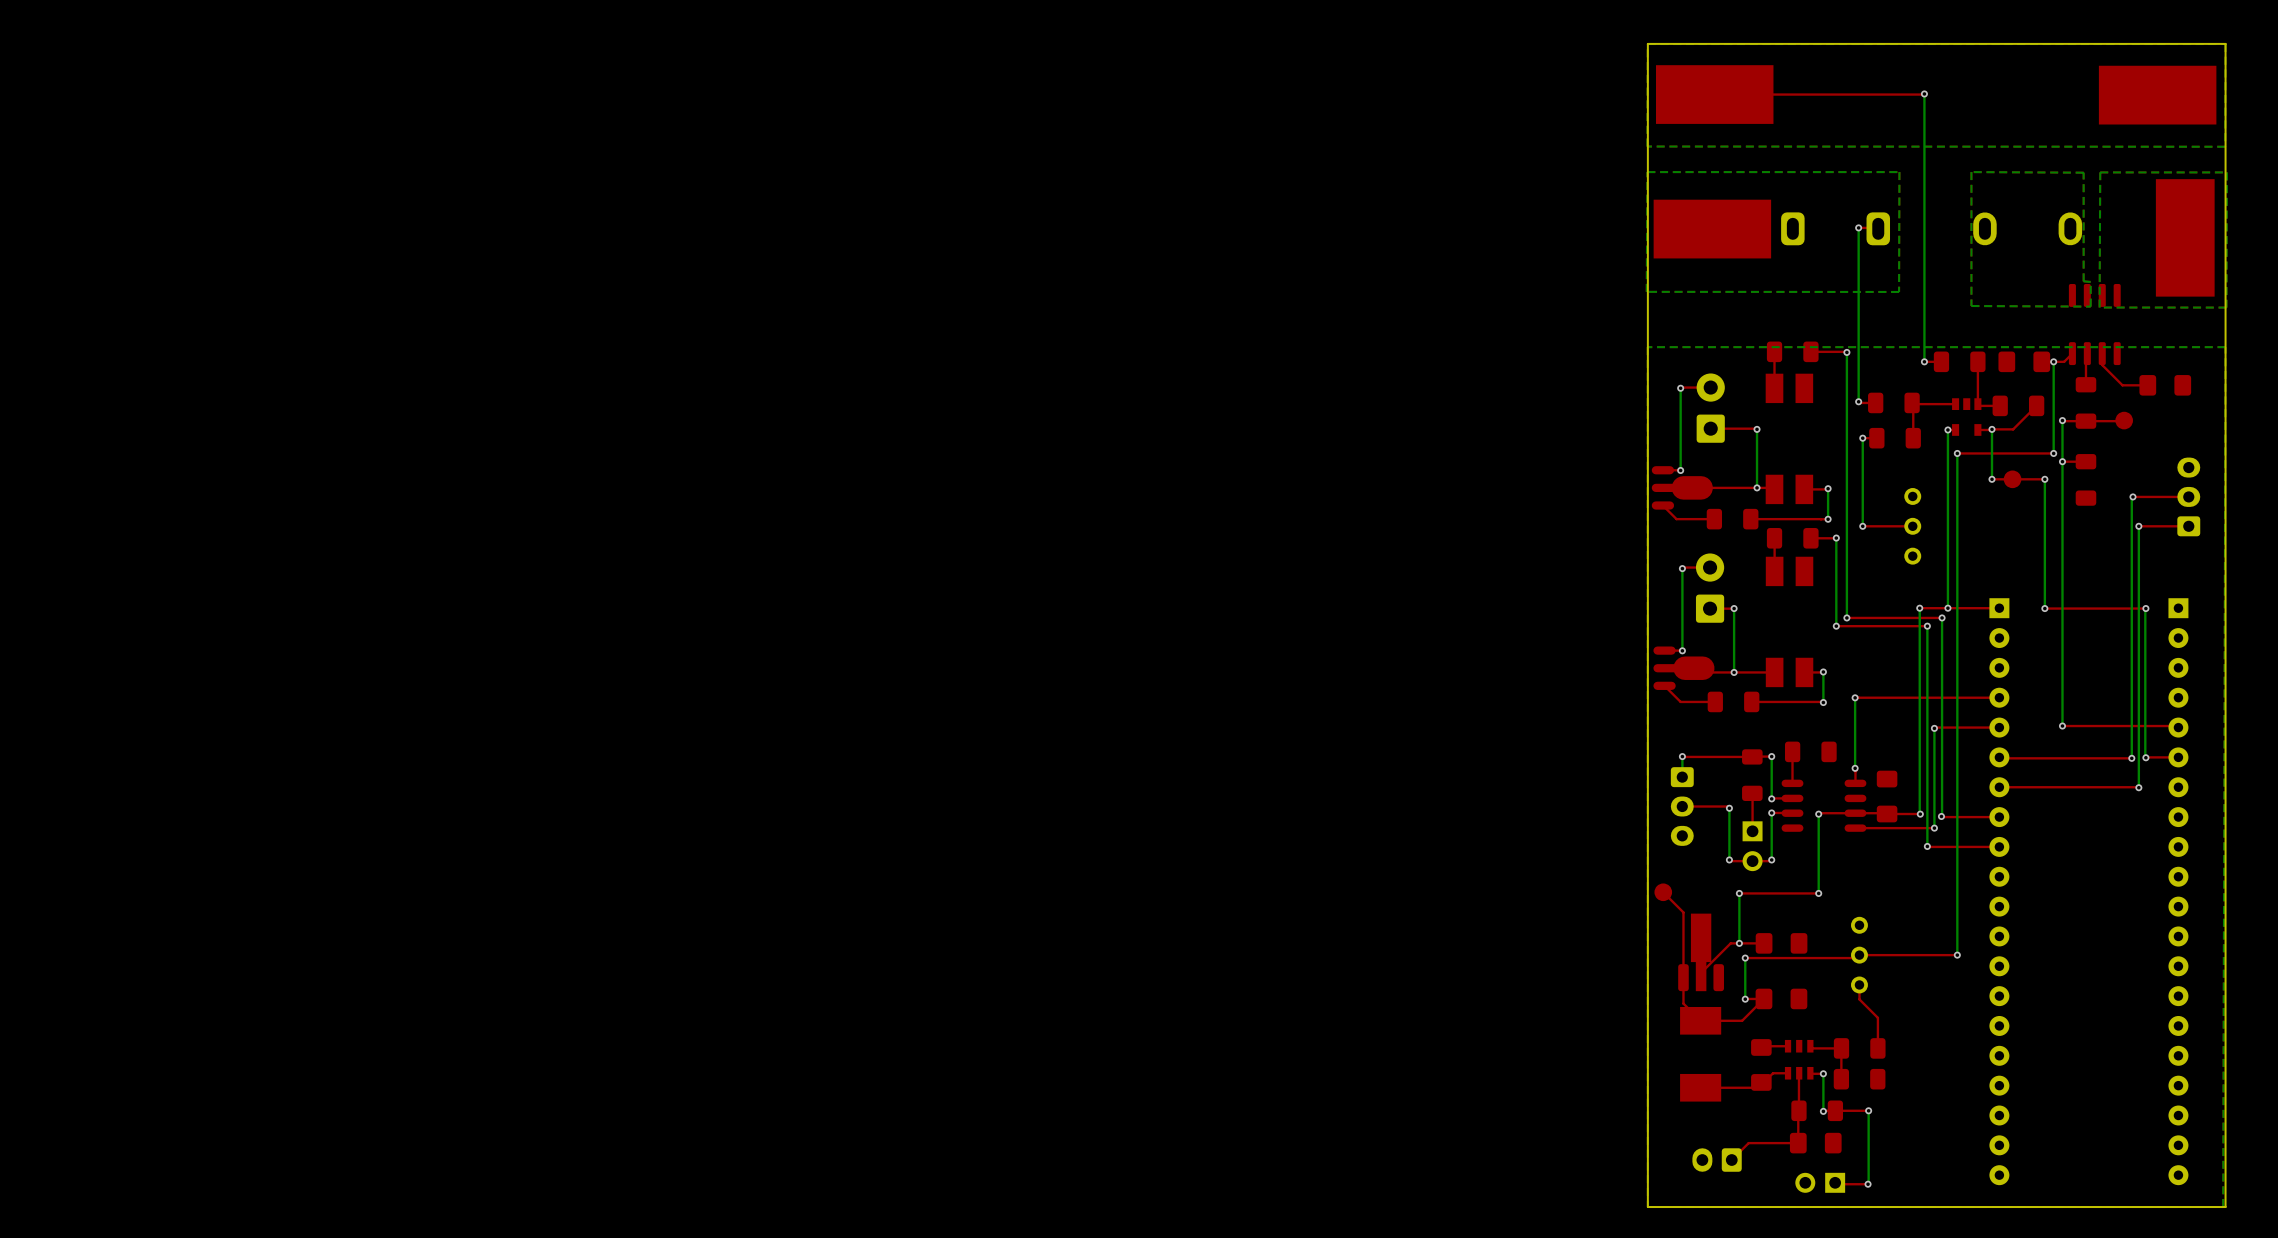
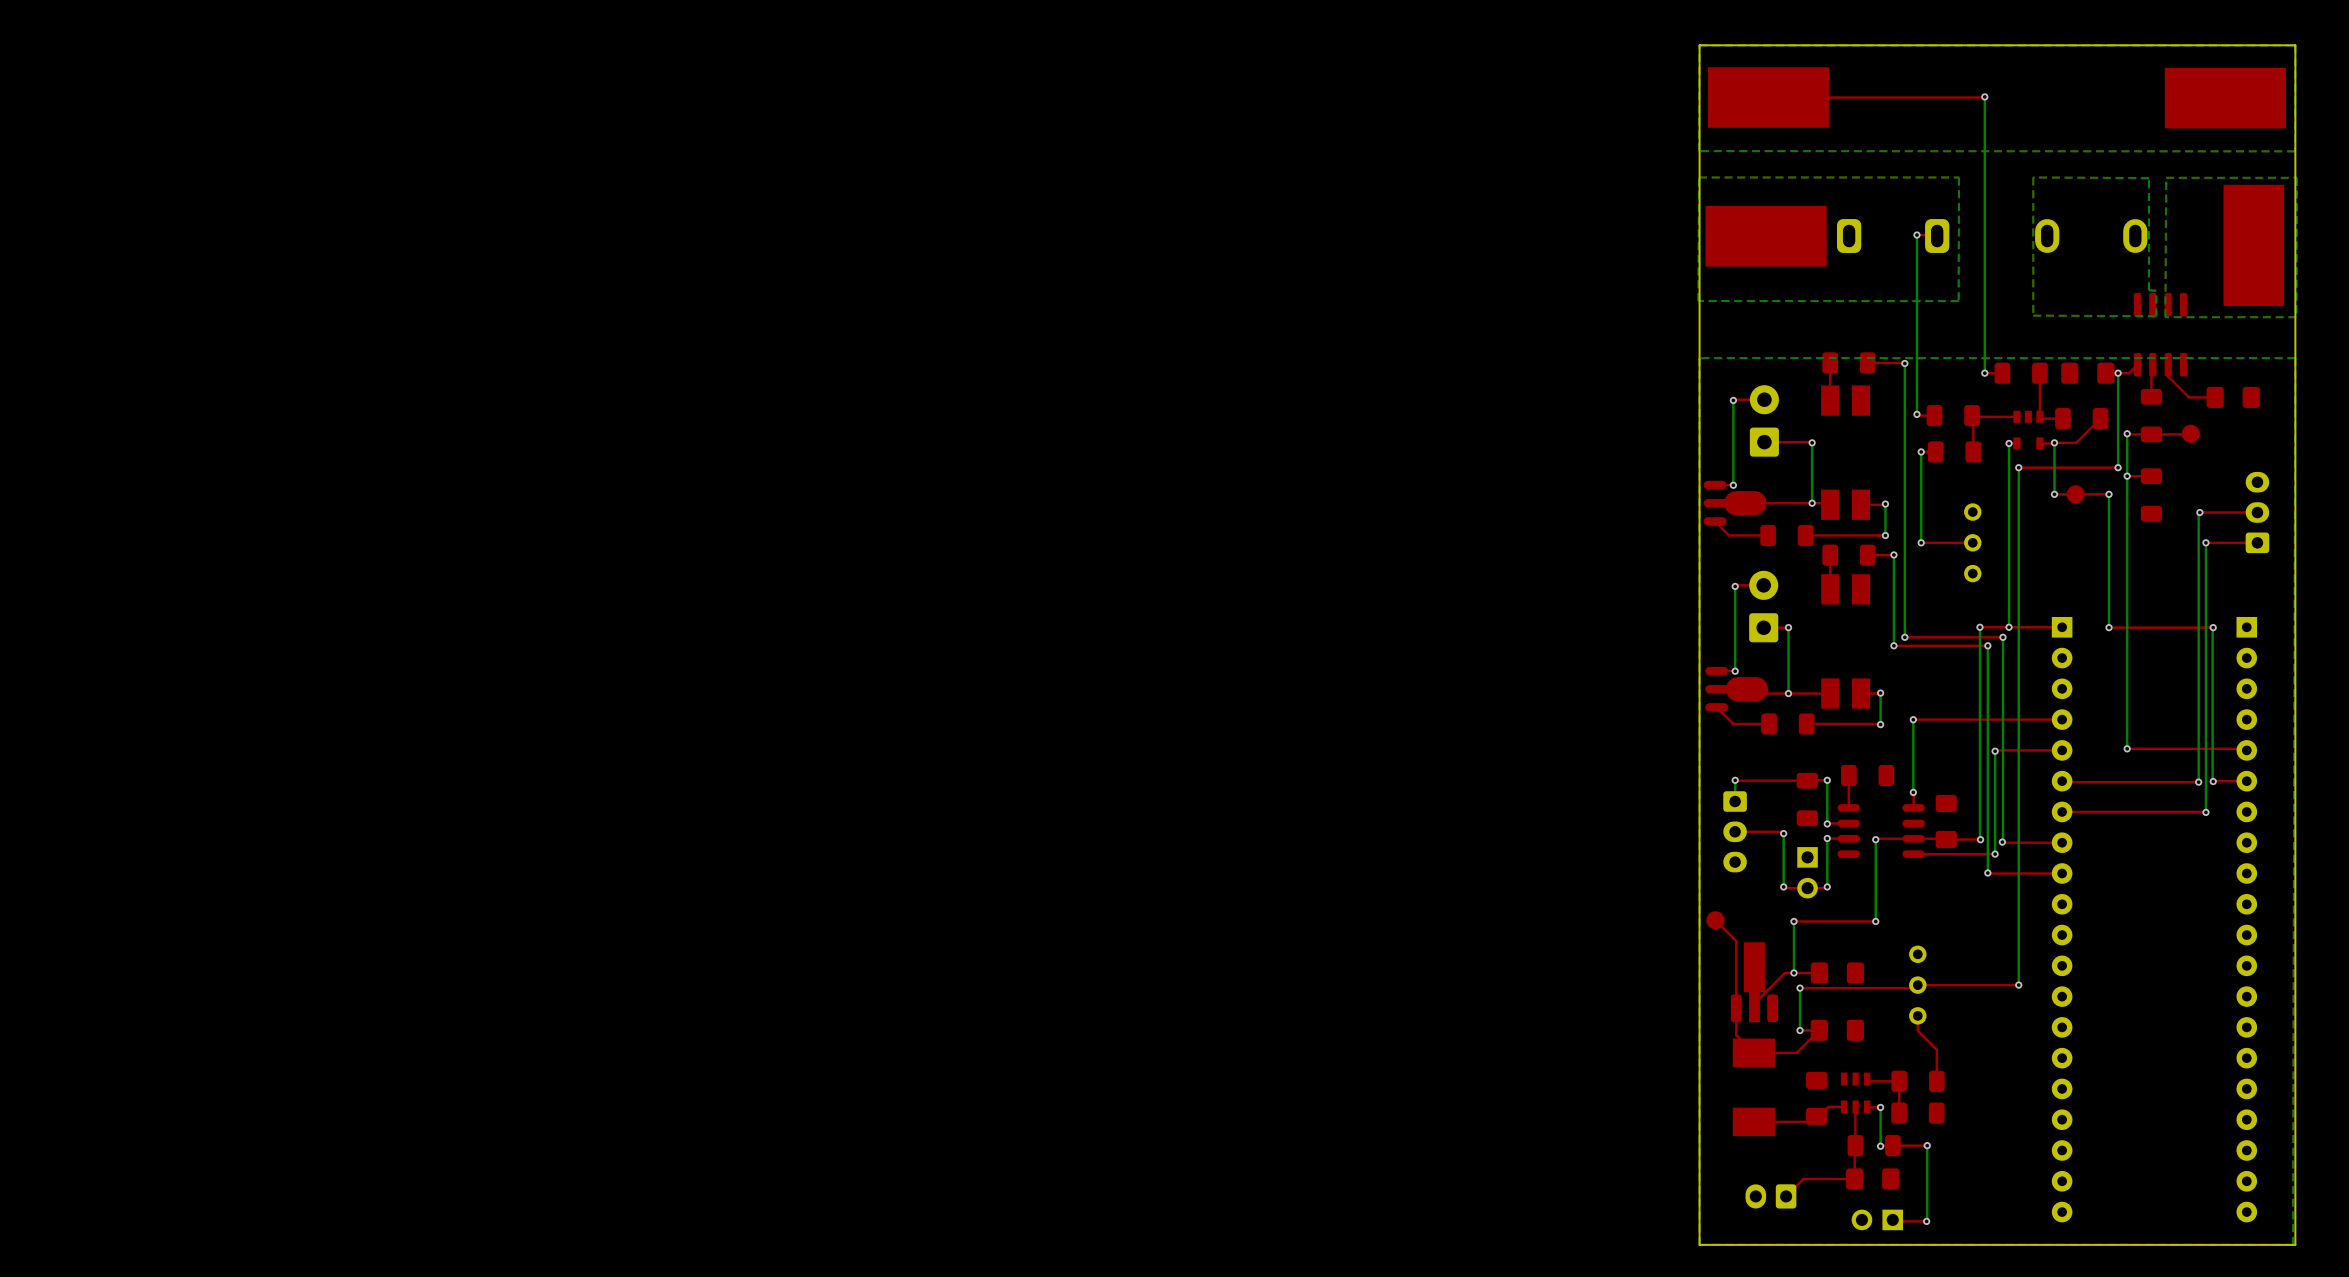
top track: (1752, 793) (1752, 831) -> none
top track: (1788, 1046) (1761, 1047) -> none

